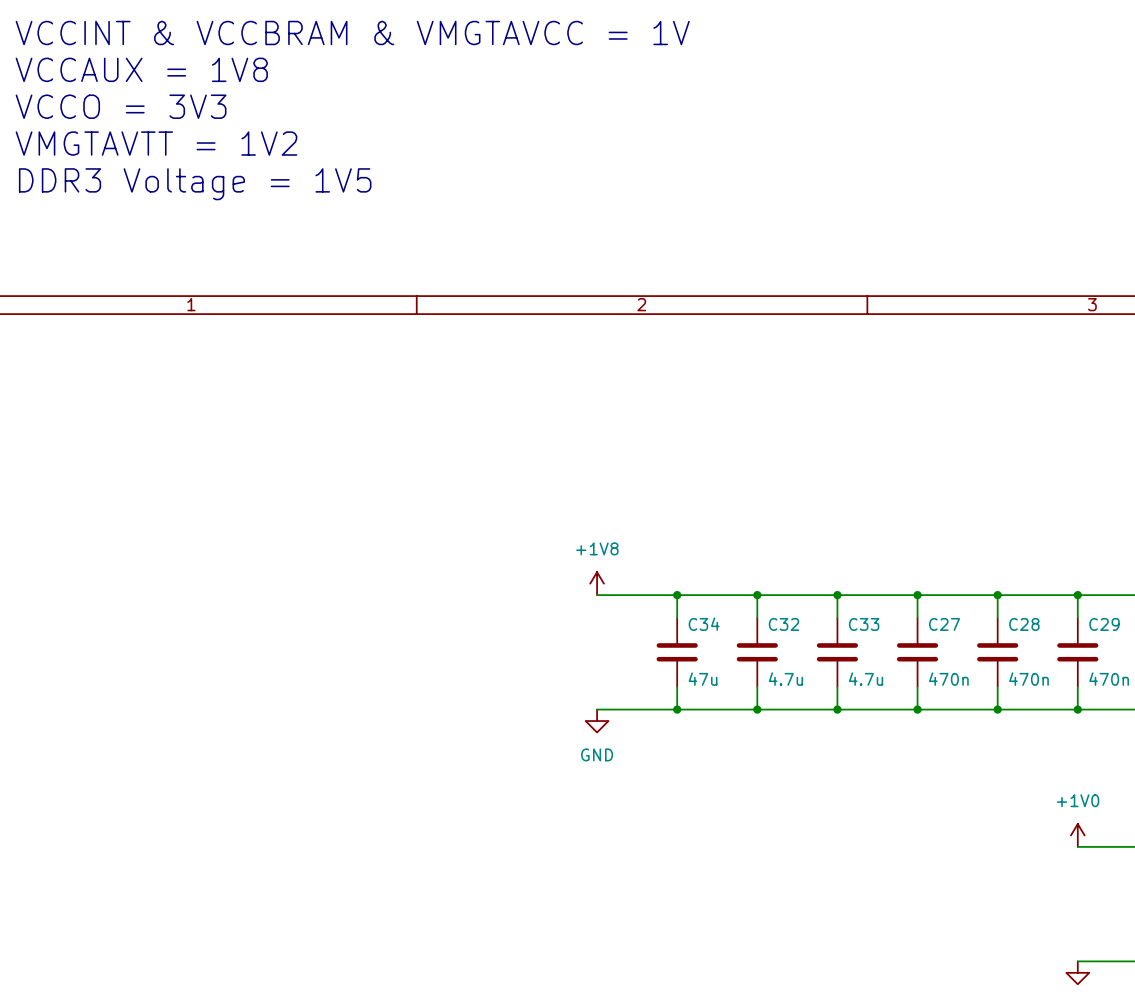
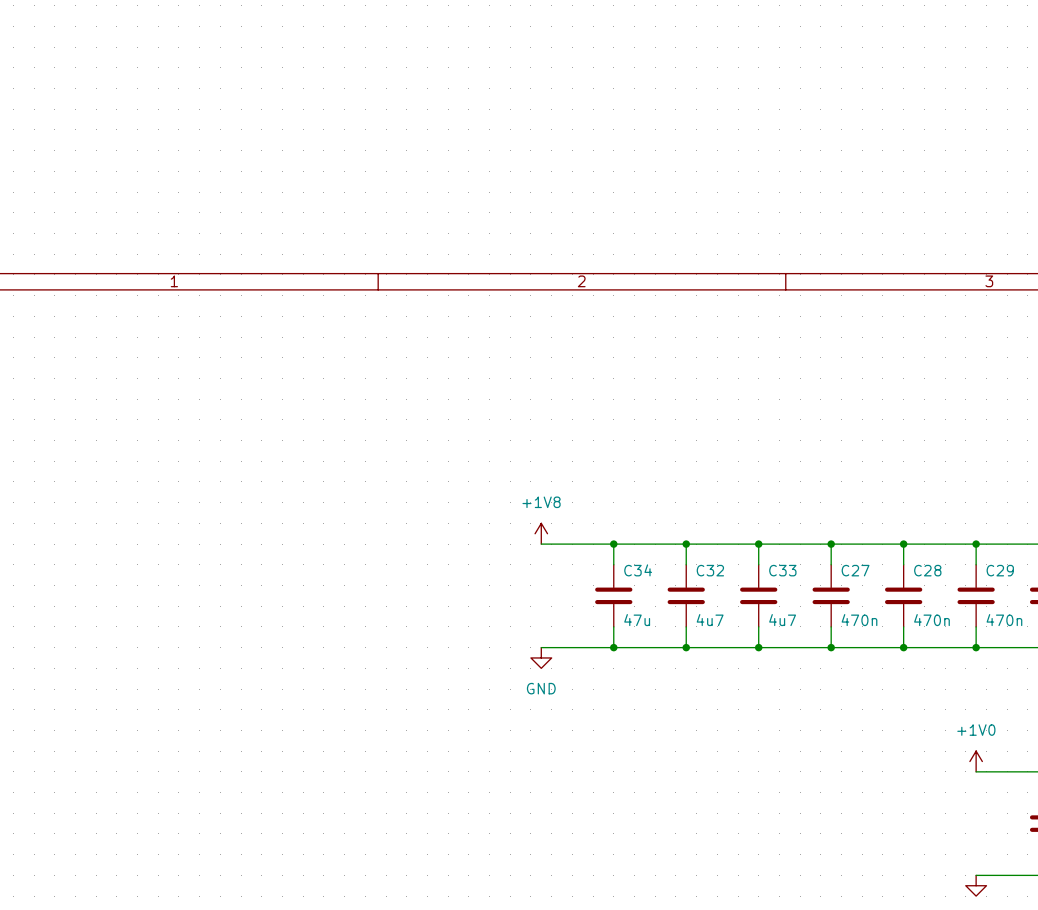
text: VCCINT & VCCBRAM & VMGTAVCC = 1V (352, 32) -> none
text: VCCAUX = 1V8 (141, 69) -> none
text: VCCO = 3V3 (121, 106) -> none
text: VMGTAVTT = 1V2 (156, 143) -> none
text: DDR3 Voltage = 1V5 (195, 184) -> none
C32 value: 4.7u (785, 679) -> 4u7 (710, 620)
C33 value: 4.7u (866, 679) -> 4u7 (782, 620)

